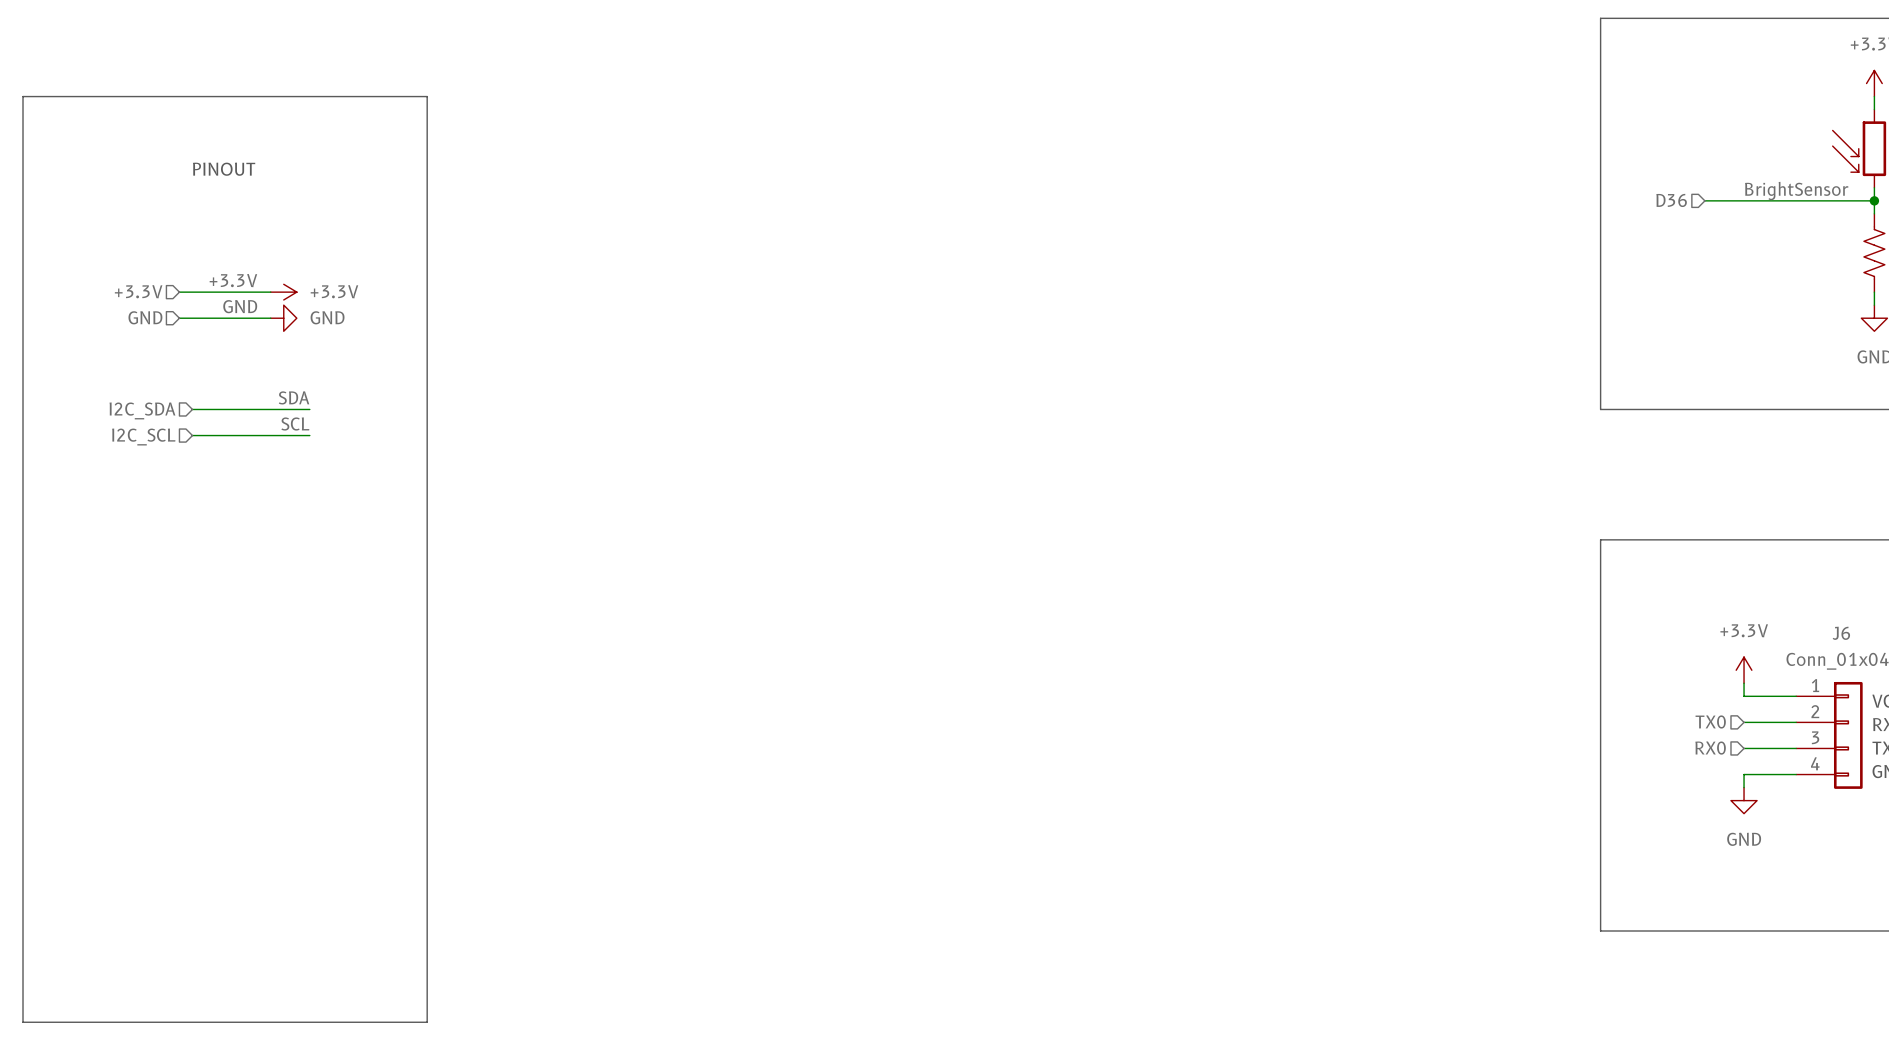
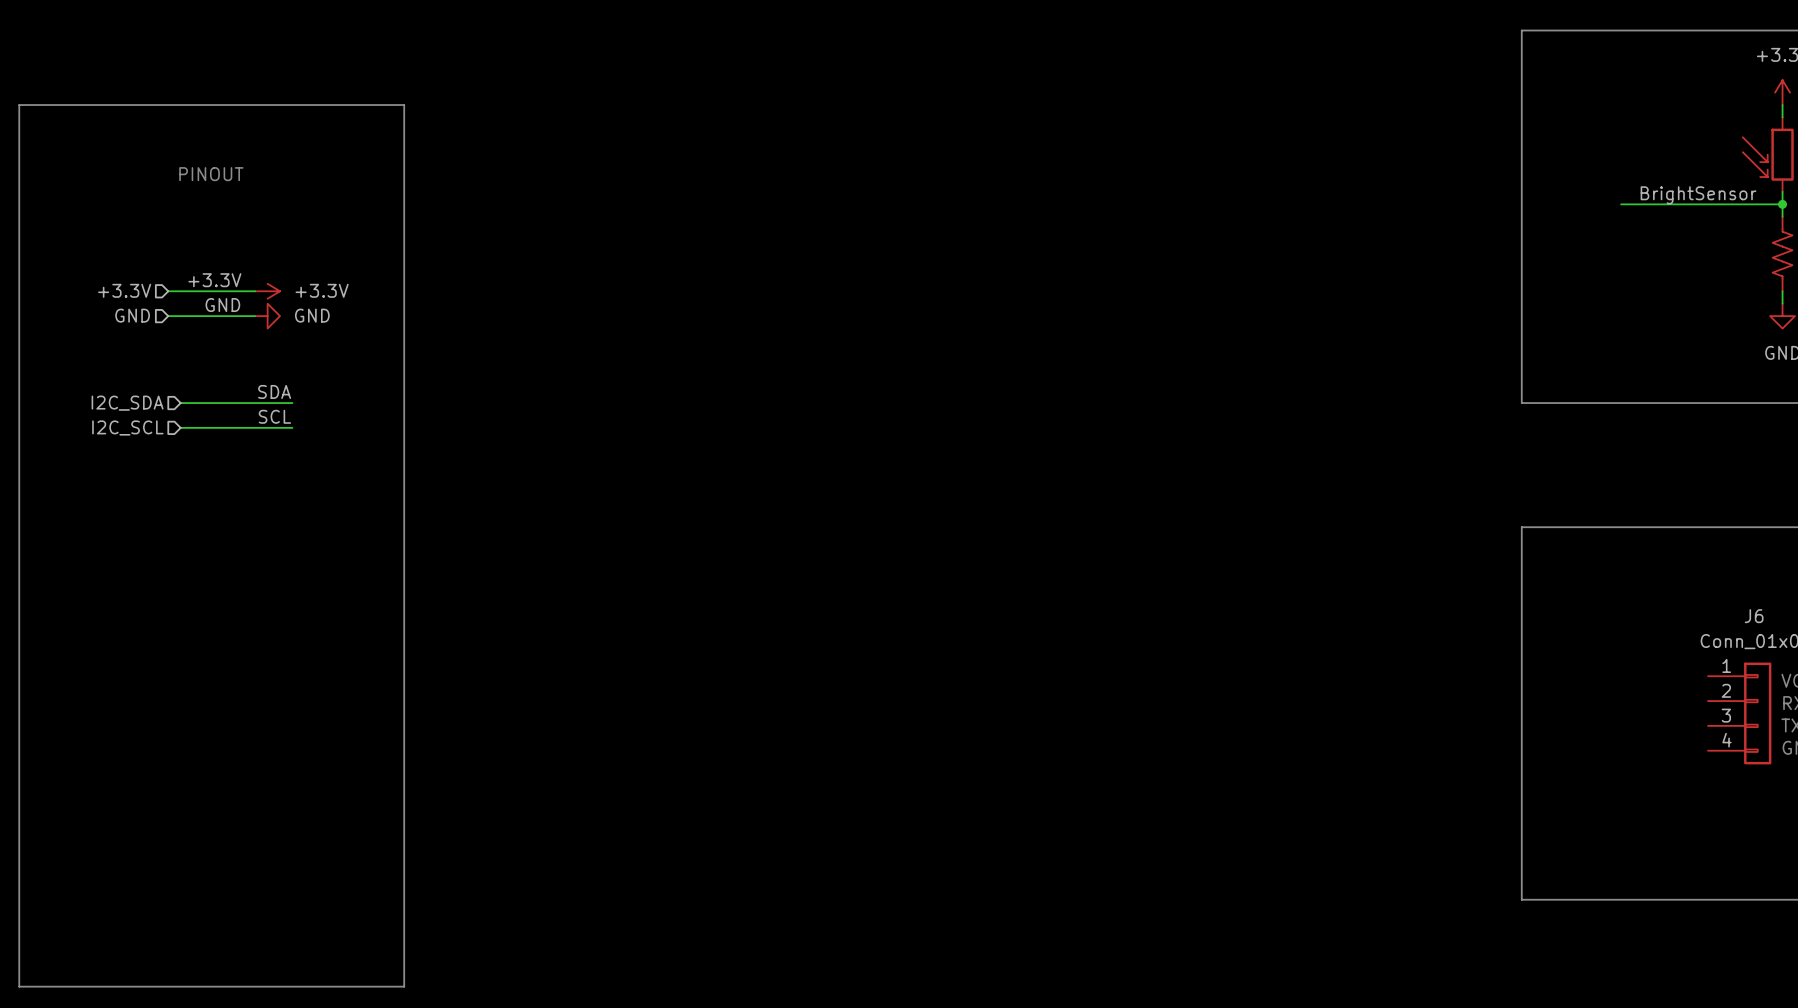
hierarchical label: D36 (1671, 200) -> none
power symbol: +3.3V (1744, 670) -> none
wire: (1744, 683) (1744, 696) (1796, 696) -> none
hierarchical label: TX0 (1710, 721) -> none
wire: (1744, 722) (1796, 722) -> none
hierarchical label: RX0 (1710, 748) -> none
wire: (1744, 748) (1796, 748) -> none
wire: (1796, 774) (1744, 774) (1744, 787) -> none
power symbol: GND (1744, 800) -> none

